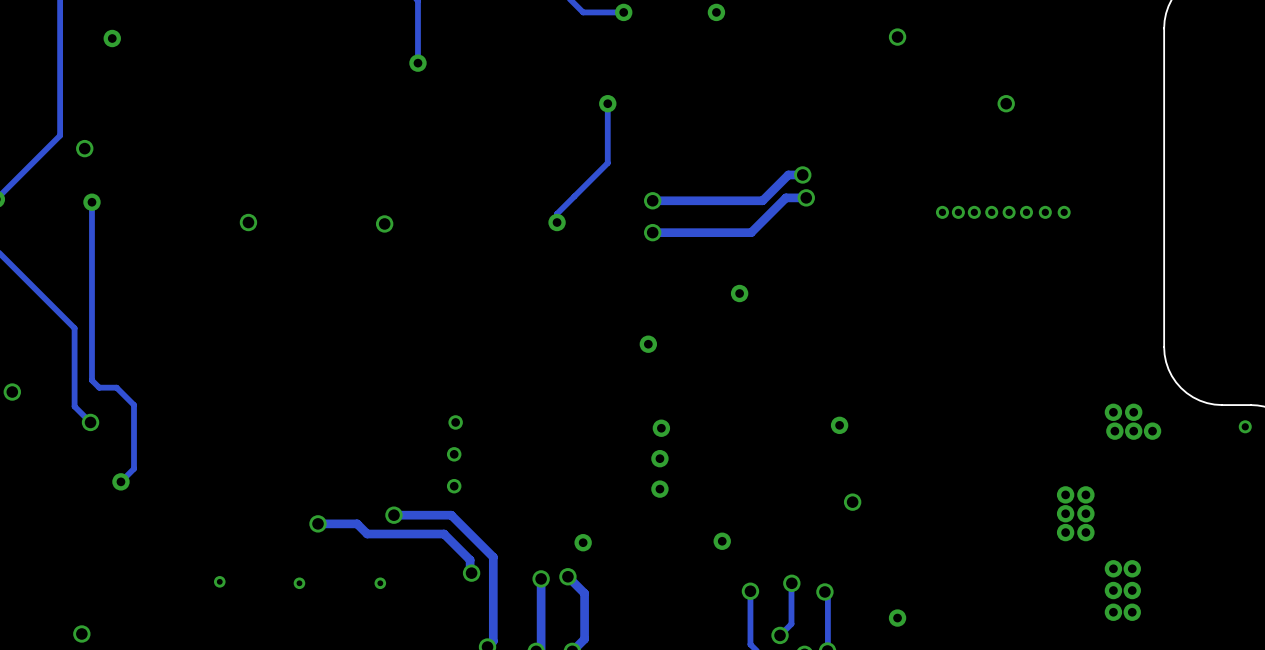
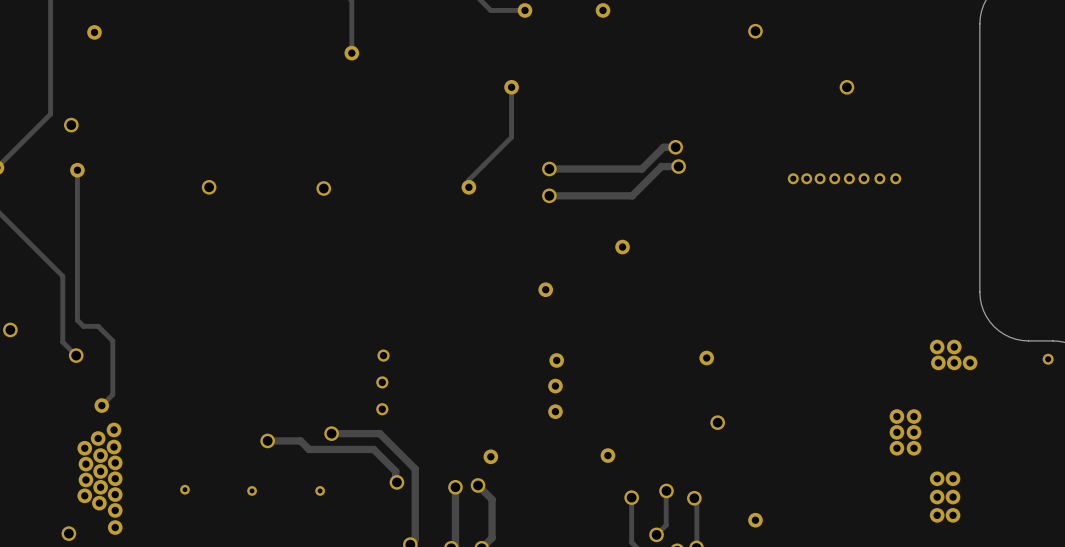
via: none -> (114, 429)
via: none -> (98, 438)
via: none -> (114, 447)
via: none -> (84, 448)
via: none -> (100, 455)
via: none -> (115, 462)
via: none -> (85, 464)
via: none -> (100, 471)
via: none -> (115, 478)
via: none -> (85, 479)
via: none -> (100, 487)
via: none -> (115, 494)
via: none -> (84, 495)
via: none -> (99, 503)
via: none -> (115, 510)
via: none -> (115, 527)

